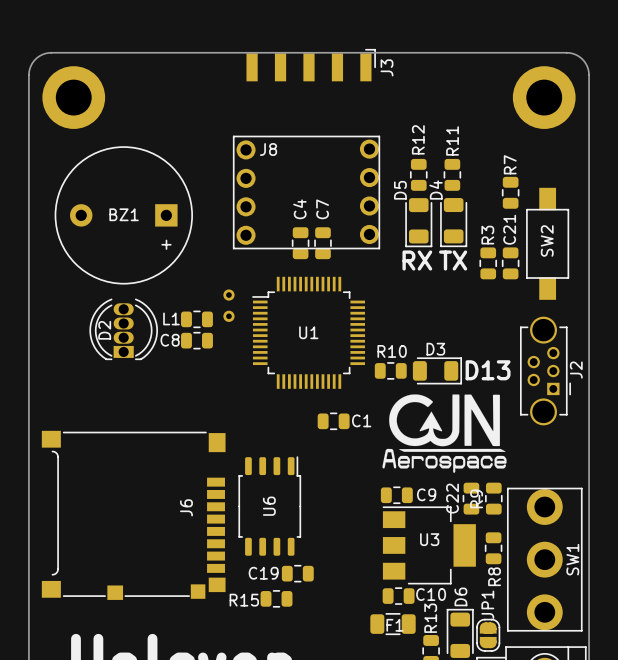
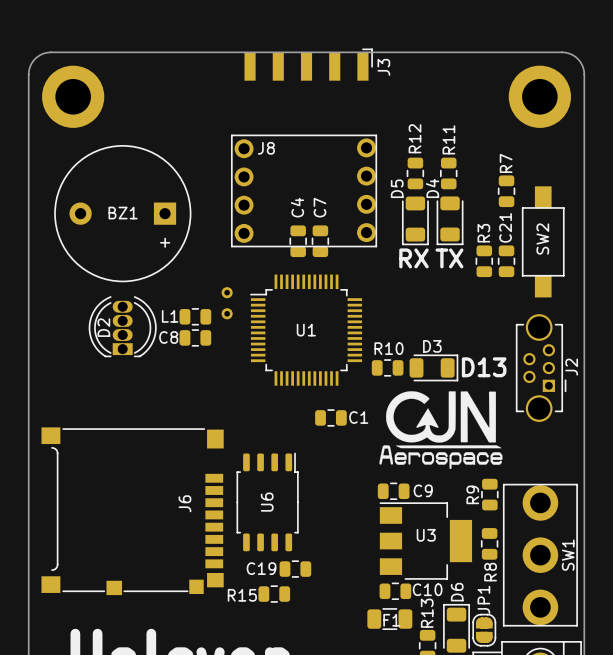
C22: (471, 498) -> none

